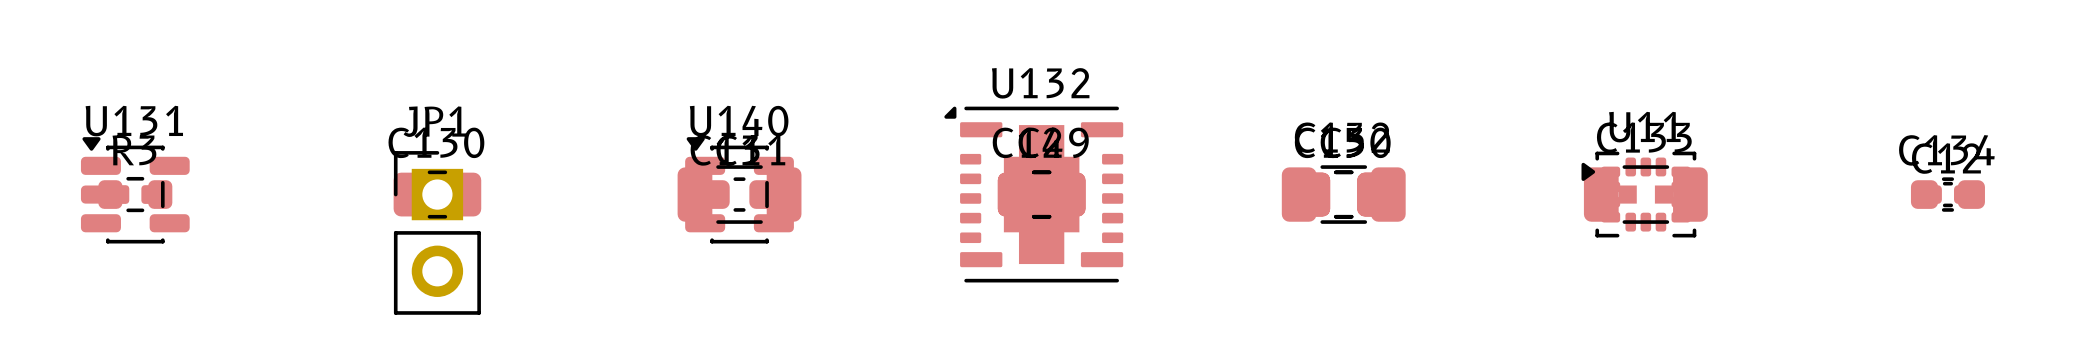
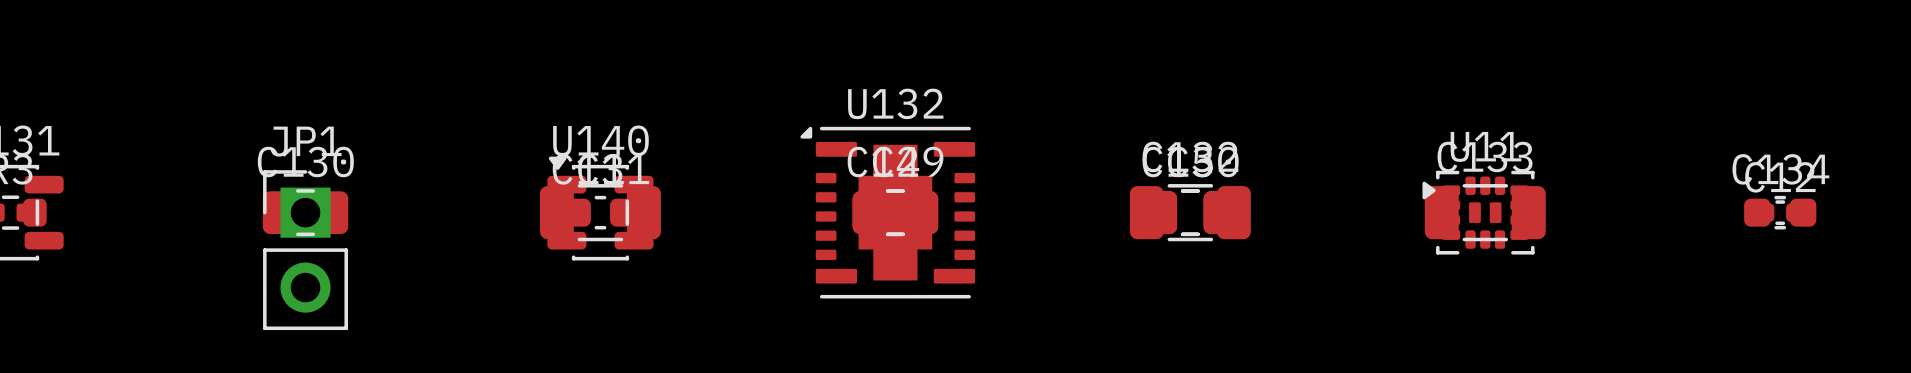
part footprint: [1618, 185, 1674, 204] -> [1469, 202, 1502, 223]

